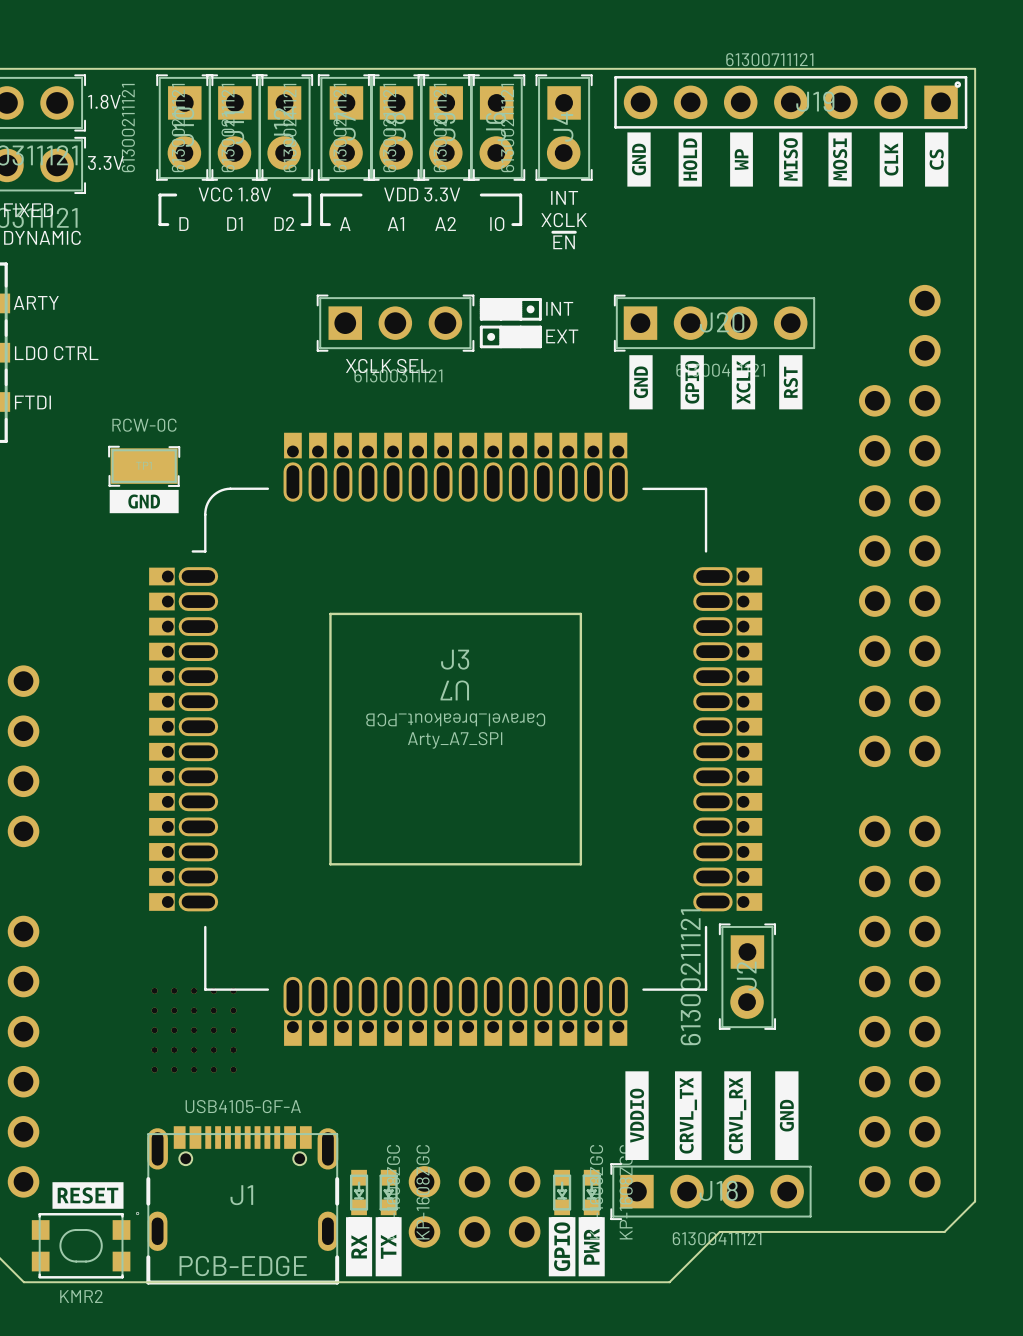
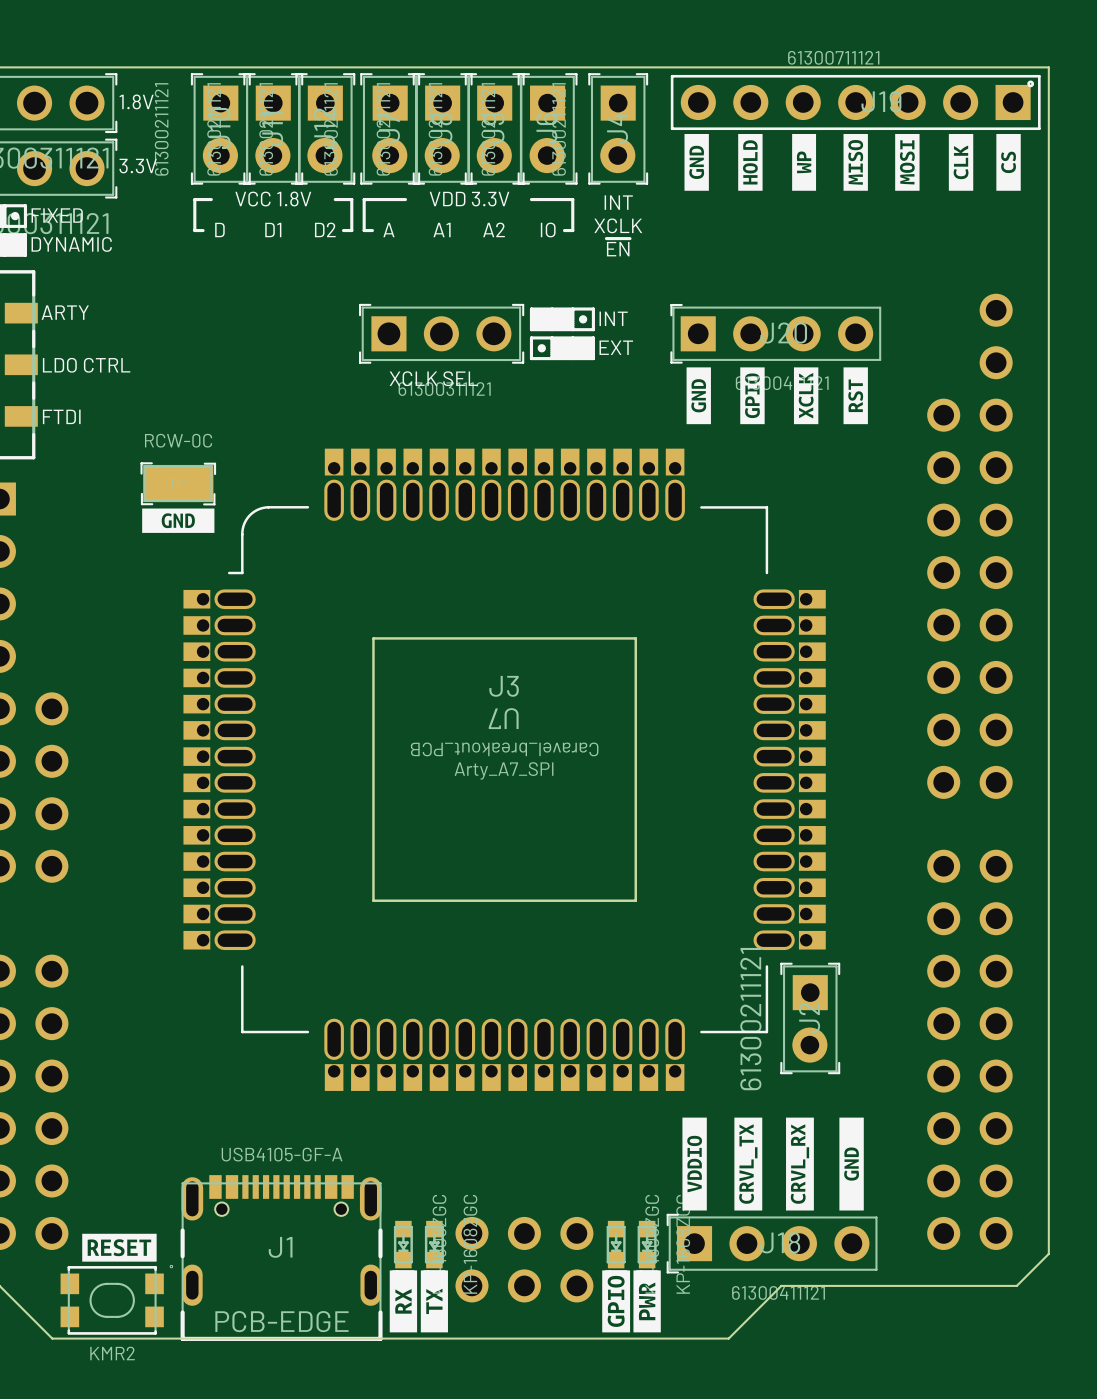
part: (194, 1030) -> none

